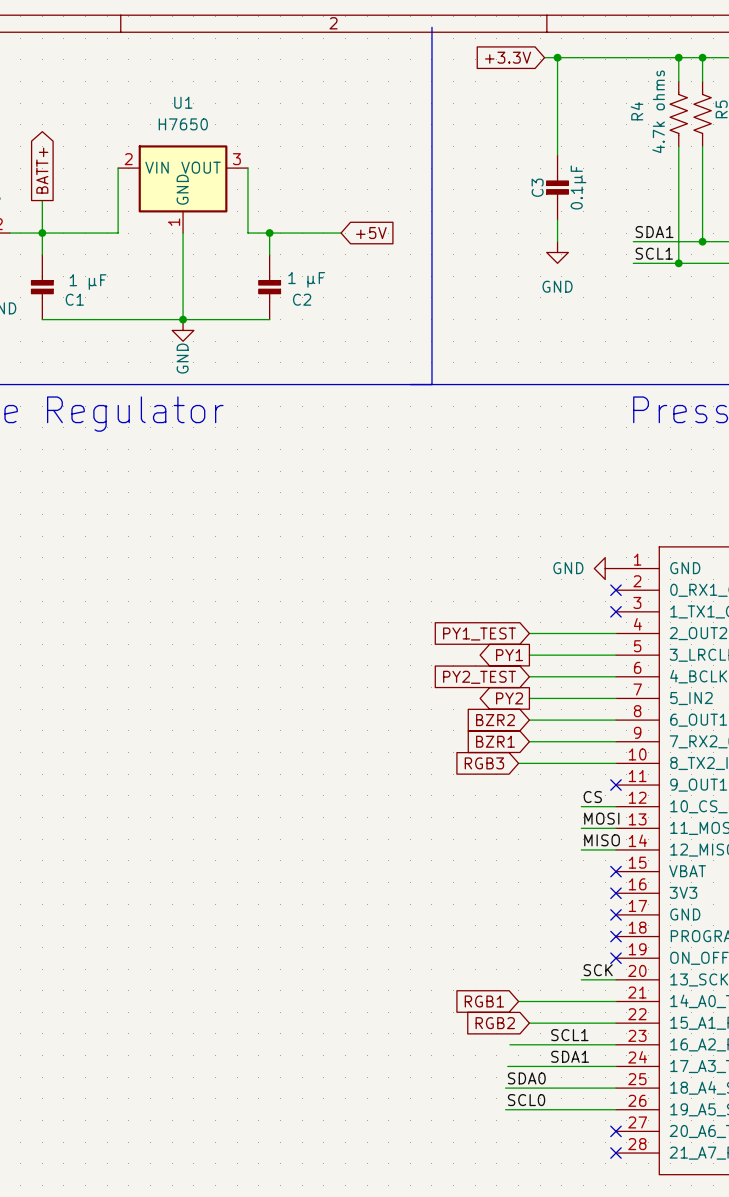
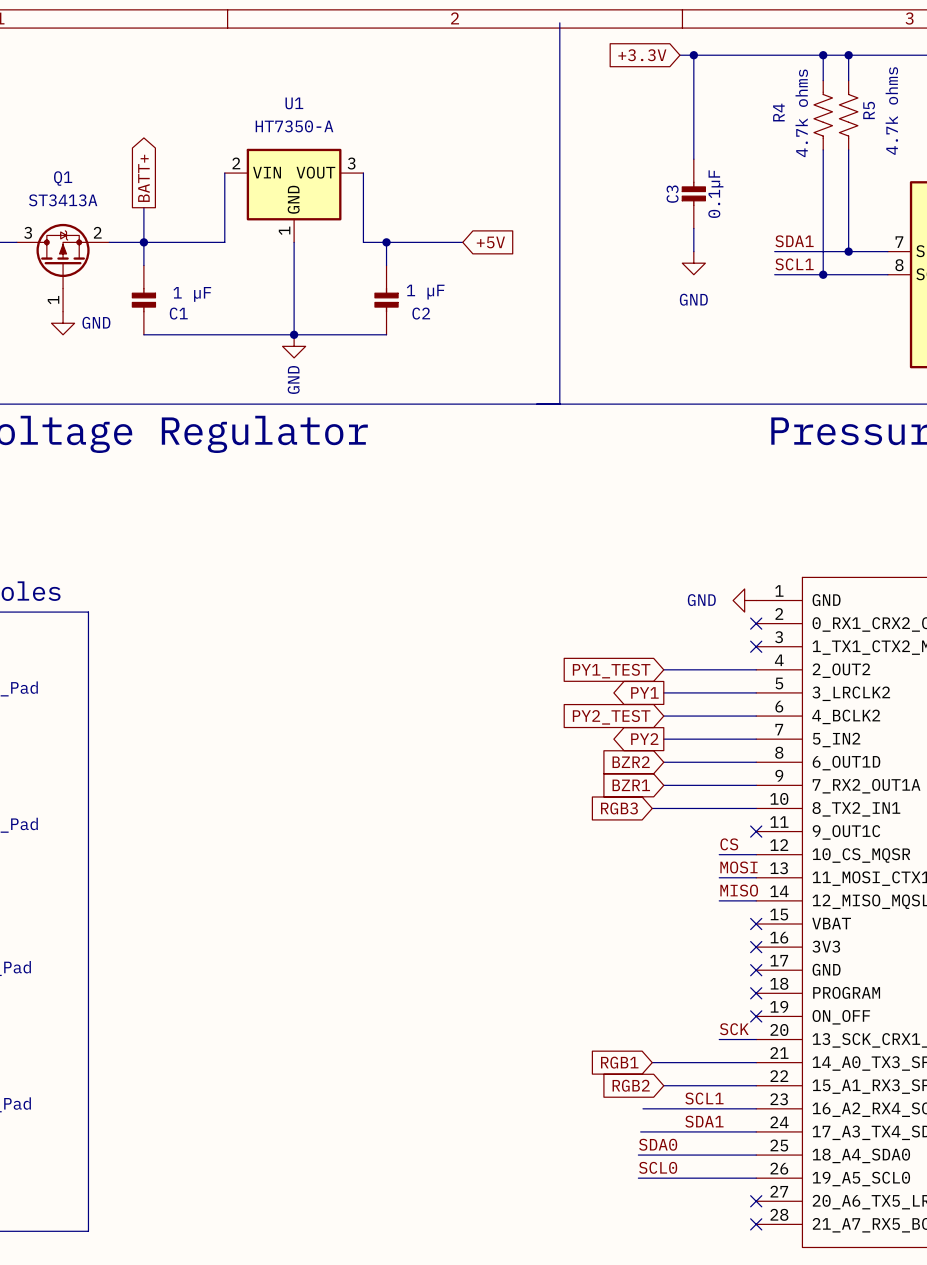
U1 value: H7650 (183, 124) -> HT7350-A (294, 126)

